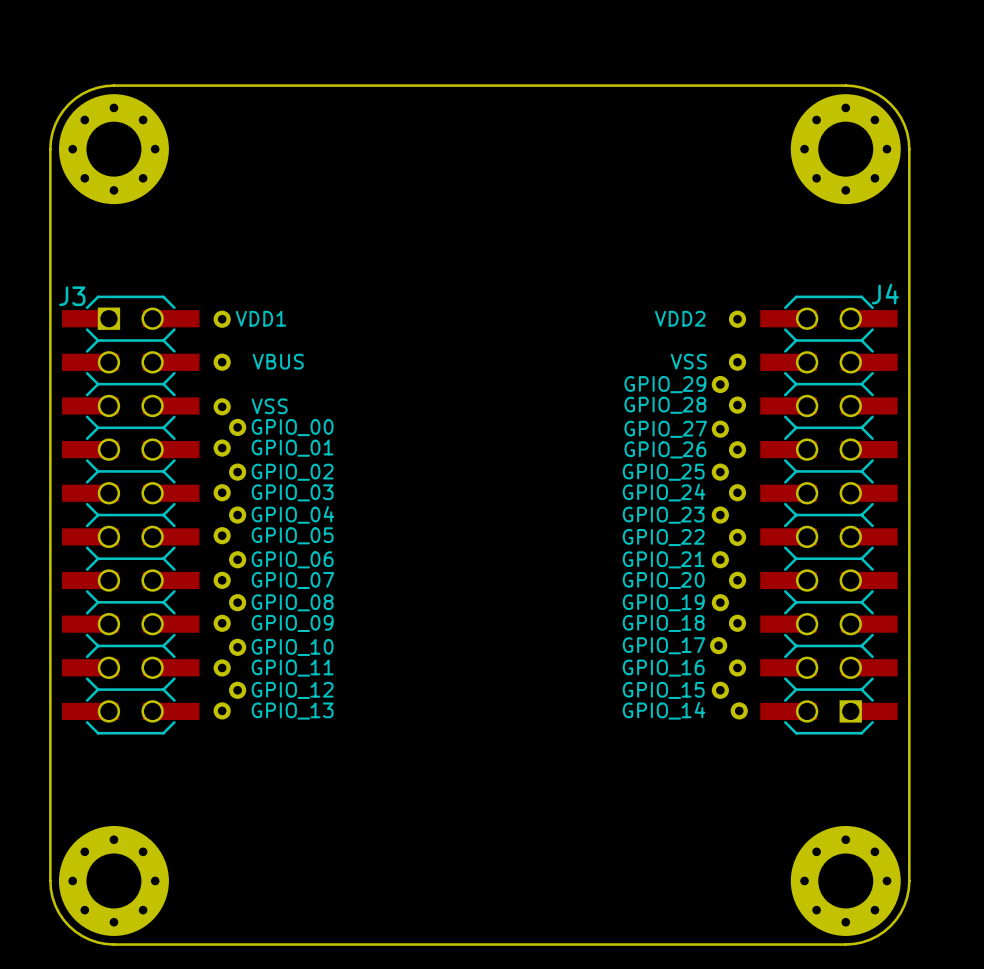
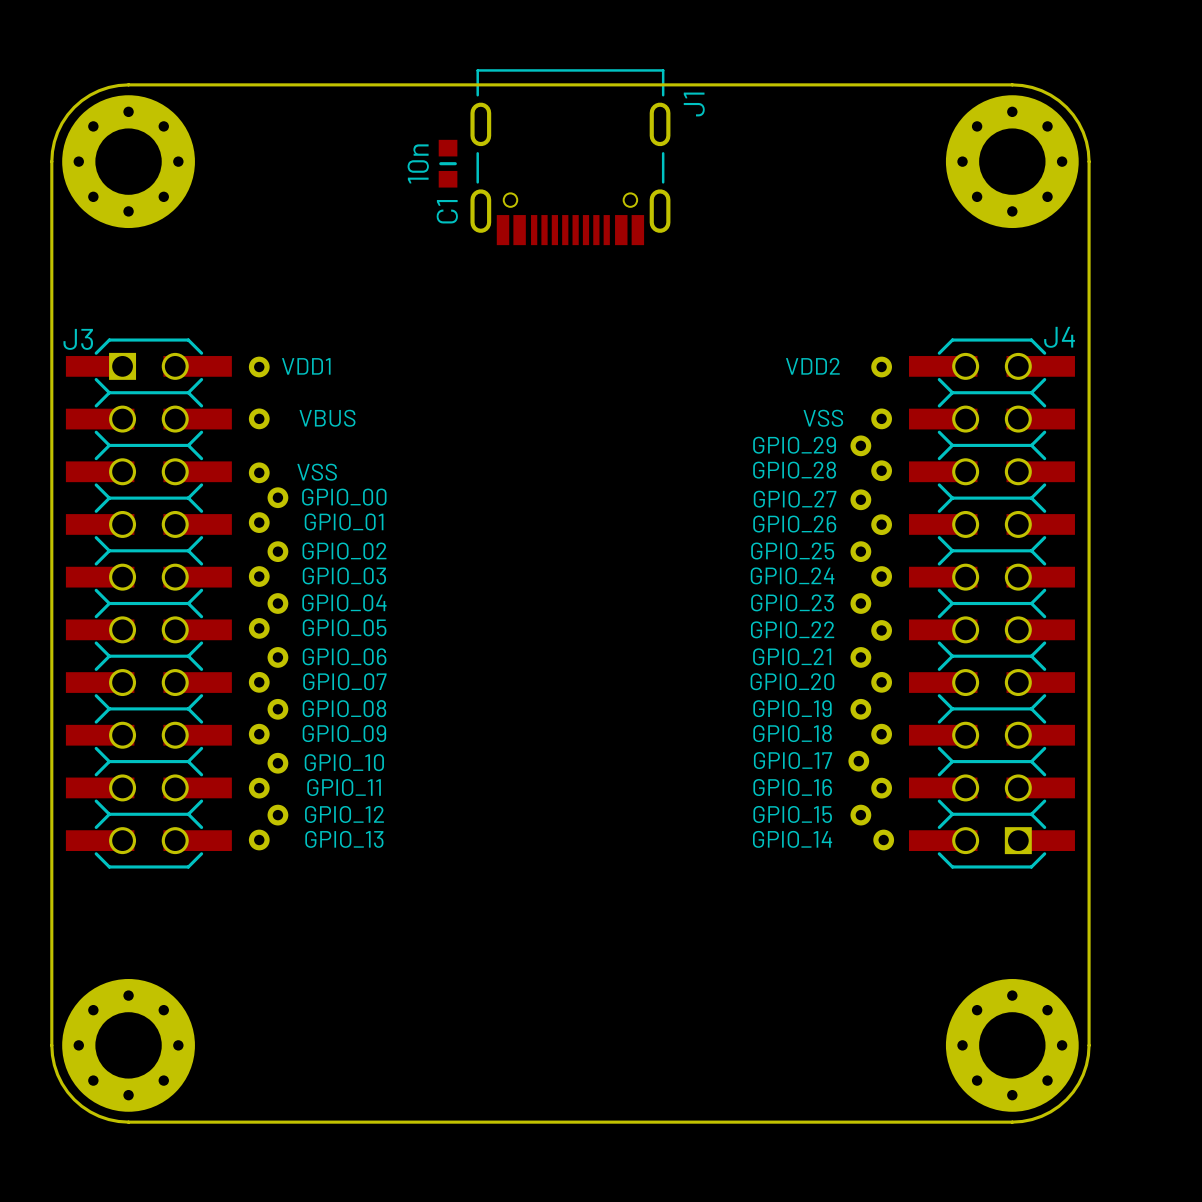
J1: none -> (570, 157)
C1: none -> 10n (448, 163)

